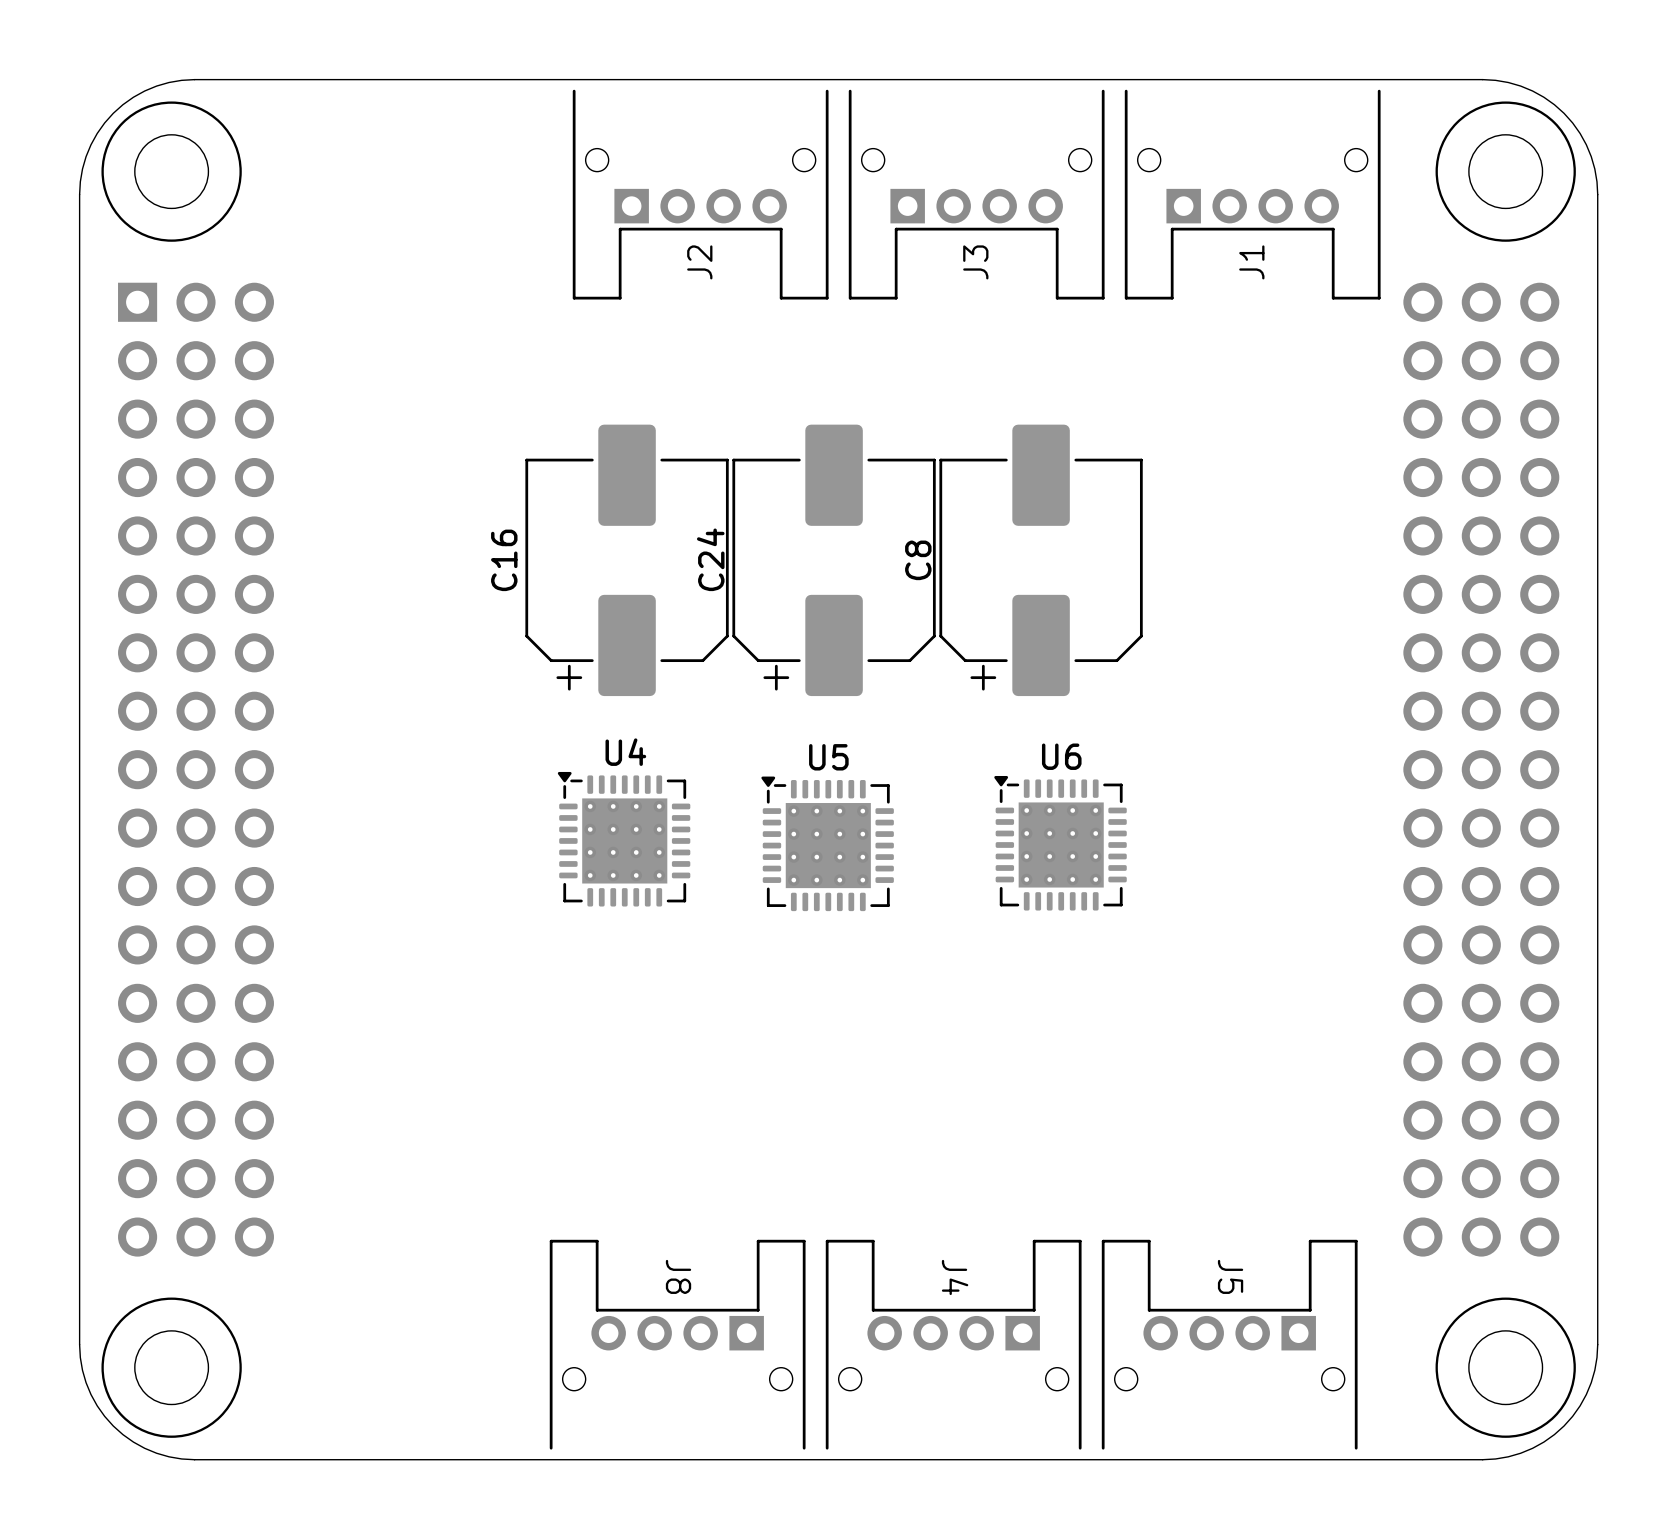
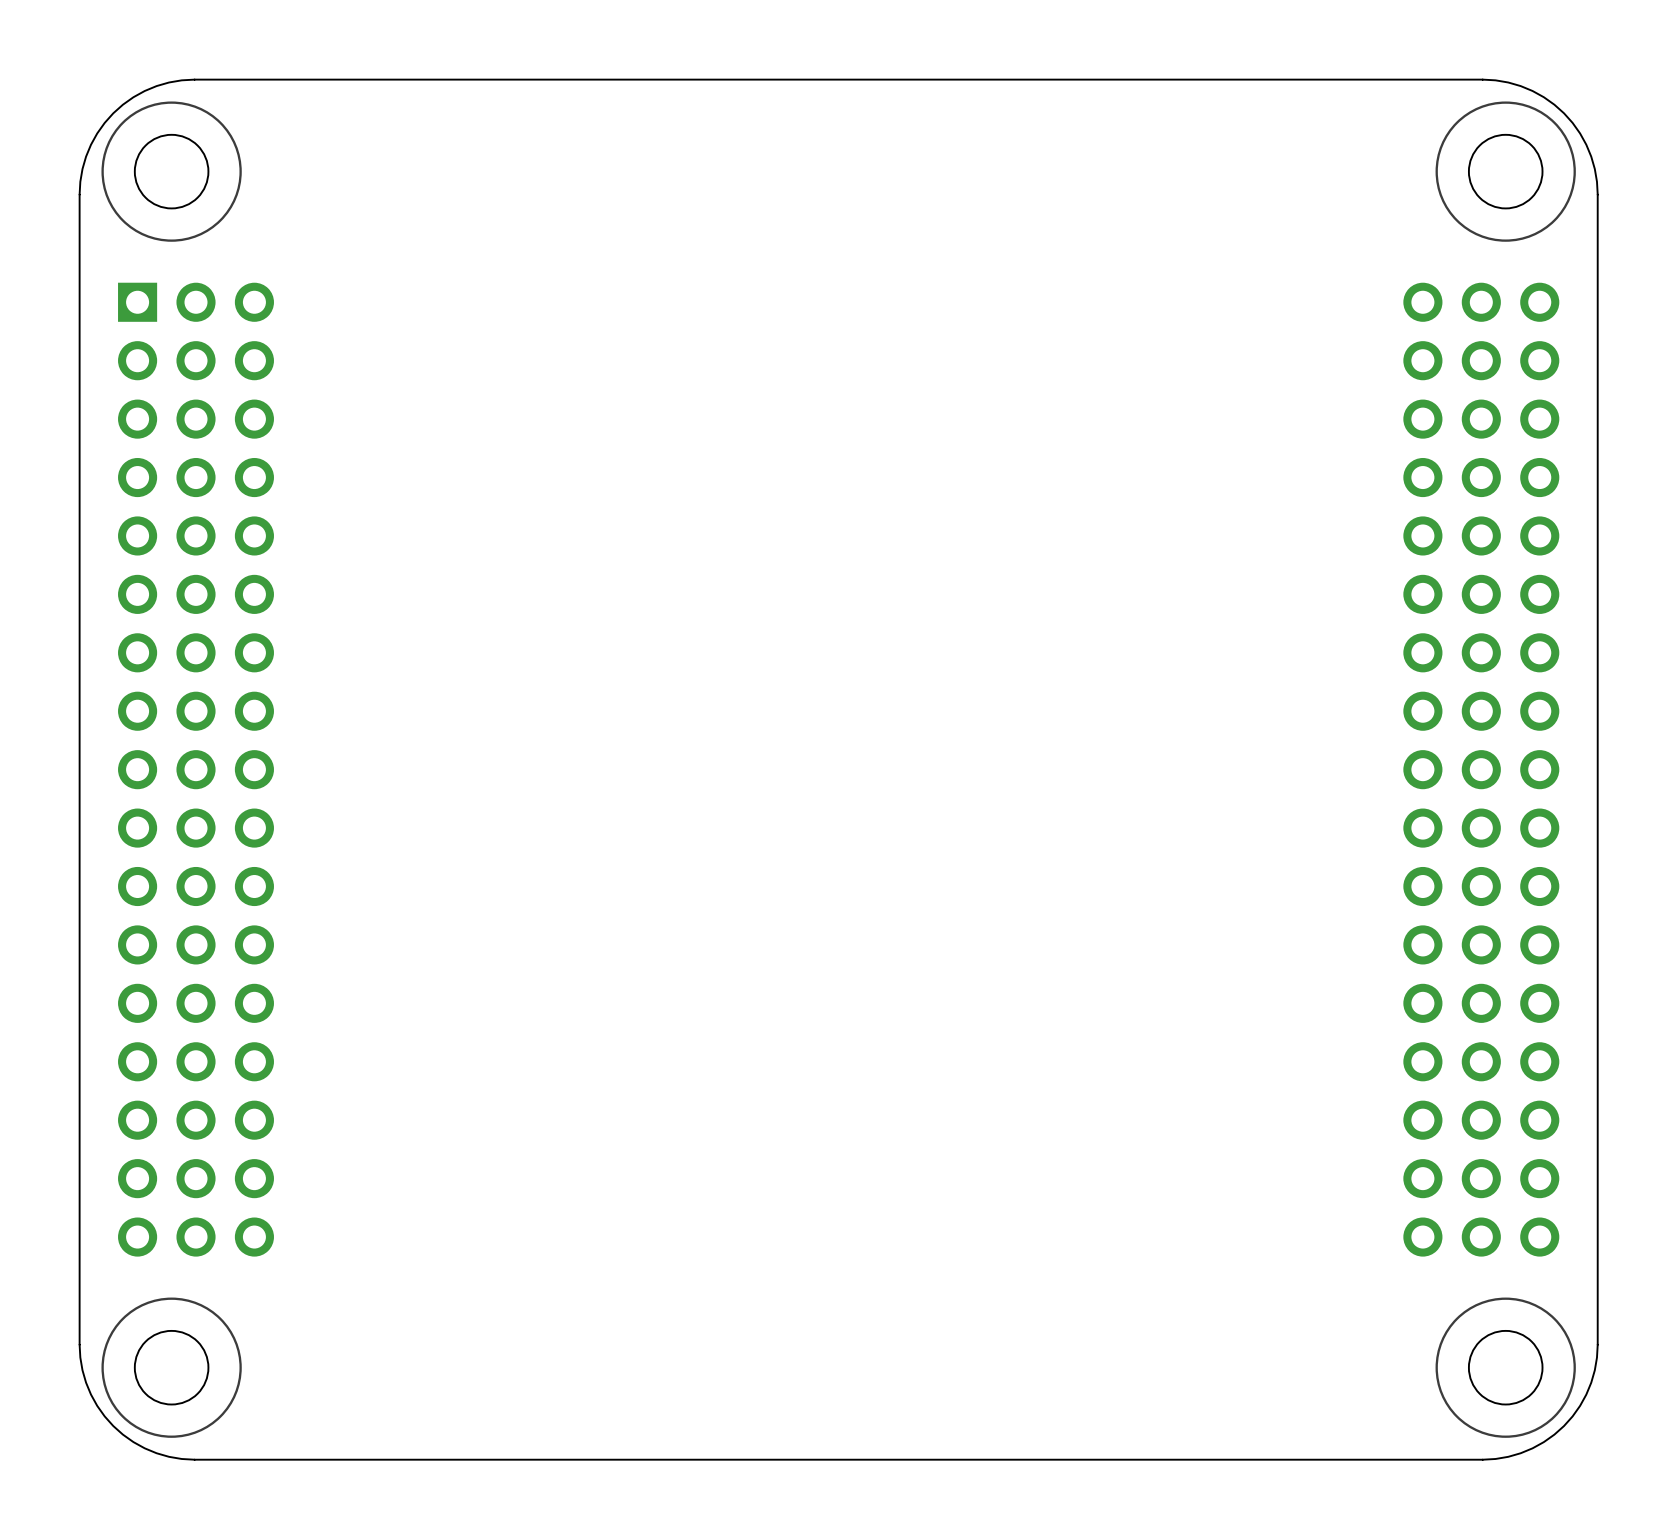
J2: (700, 194) -> none
J3: (976, 194) -> none
J1: (1252, 194) -> none
C16: (627, 560) -> none
C24: (834, 560) -> none
C8: (1041, 560) -> none
U4: (624, 839) -> none
U5: (827, 843) -> none
U6: (1060, 843) -> none
J8: (677, 1344) -> none
J4: (953, 1344) -> none
J5: (1229, 1344) -> none

